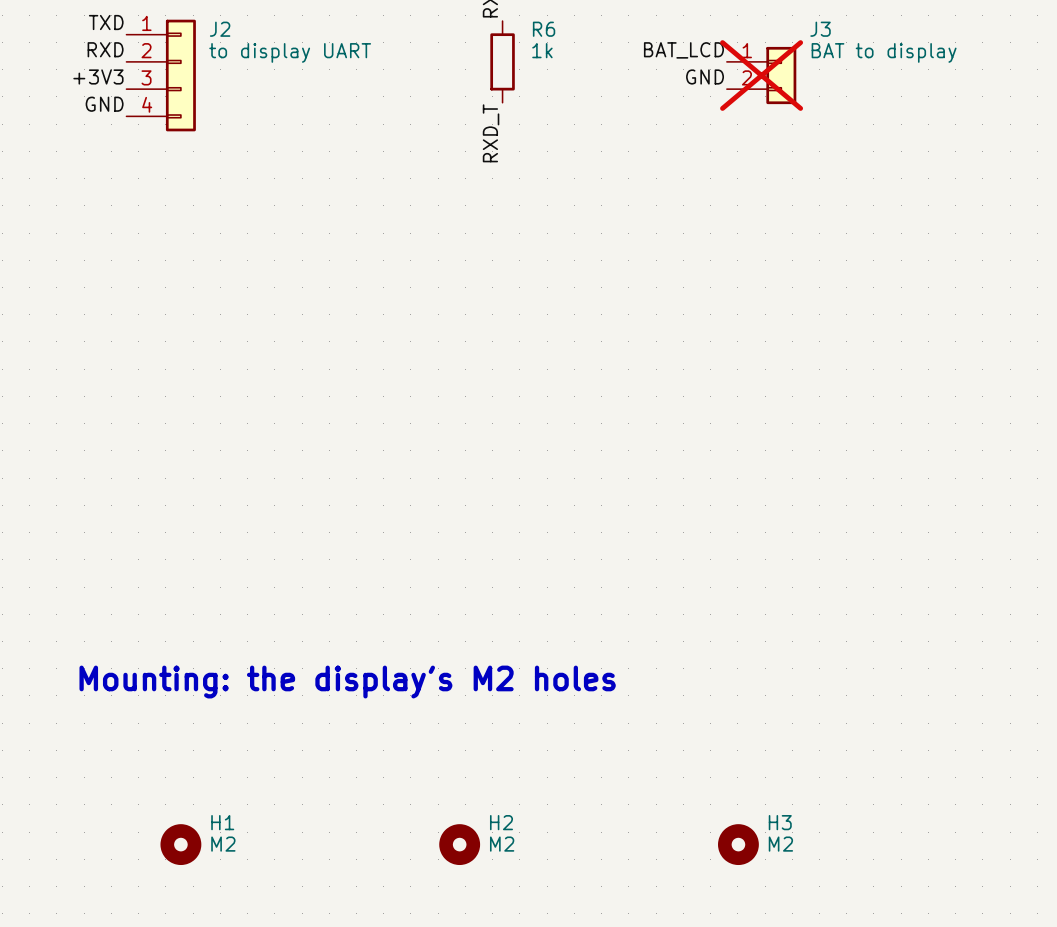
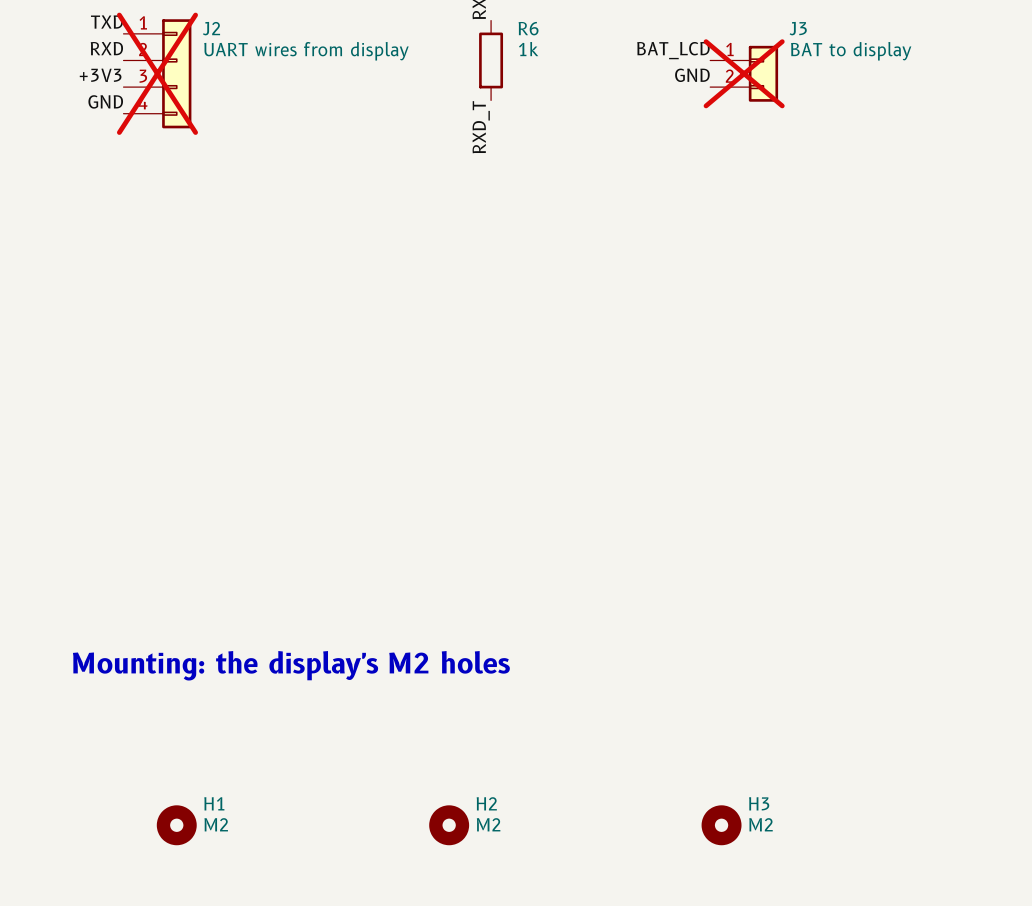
J2 value: to display UART (290, 52) -> UART wires from display (306, 51)
J2 do-not-place cross: none -> (157, 73)

